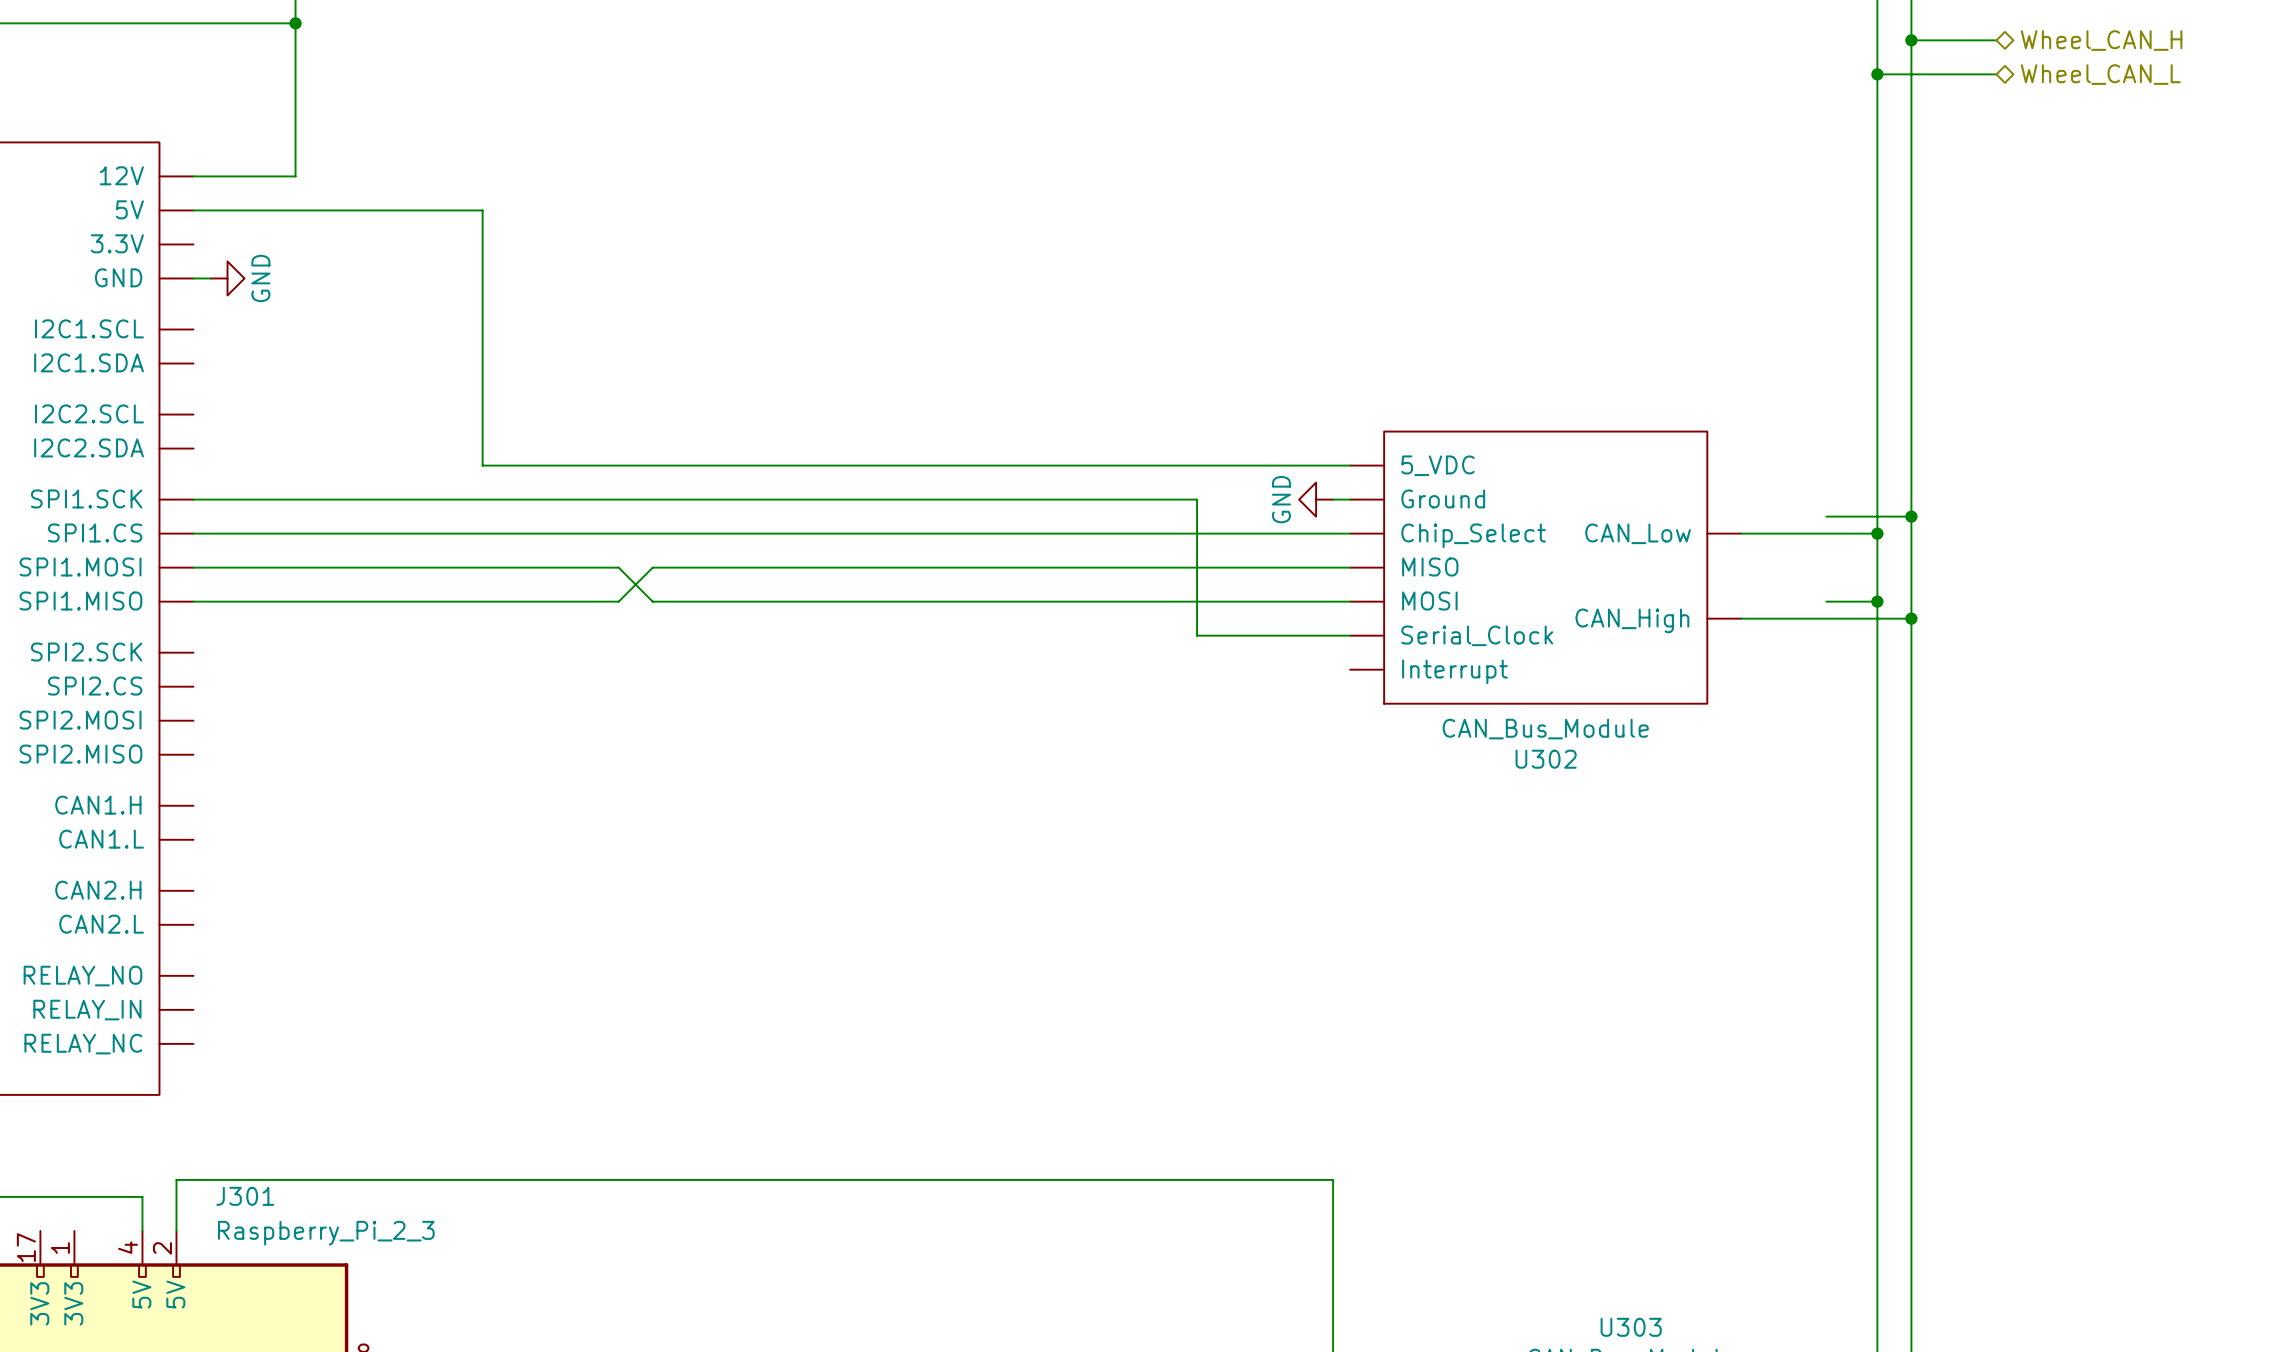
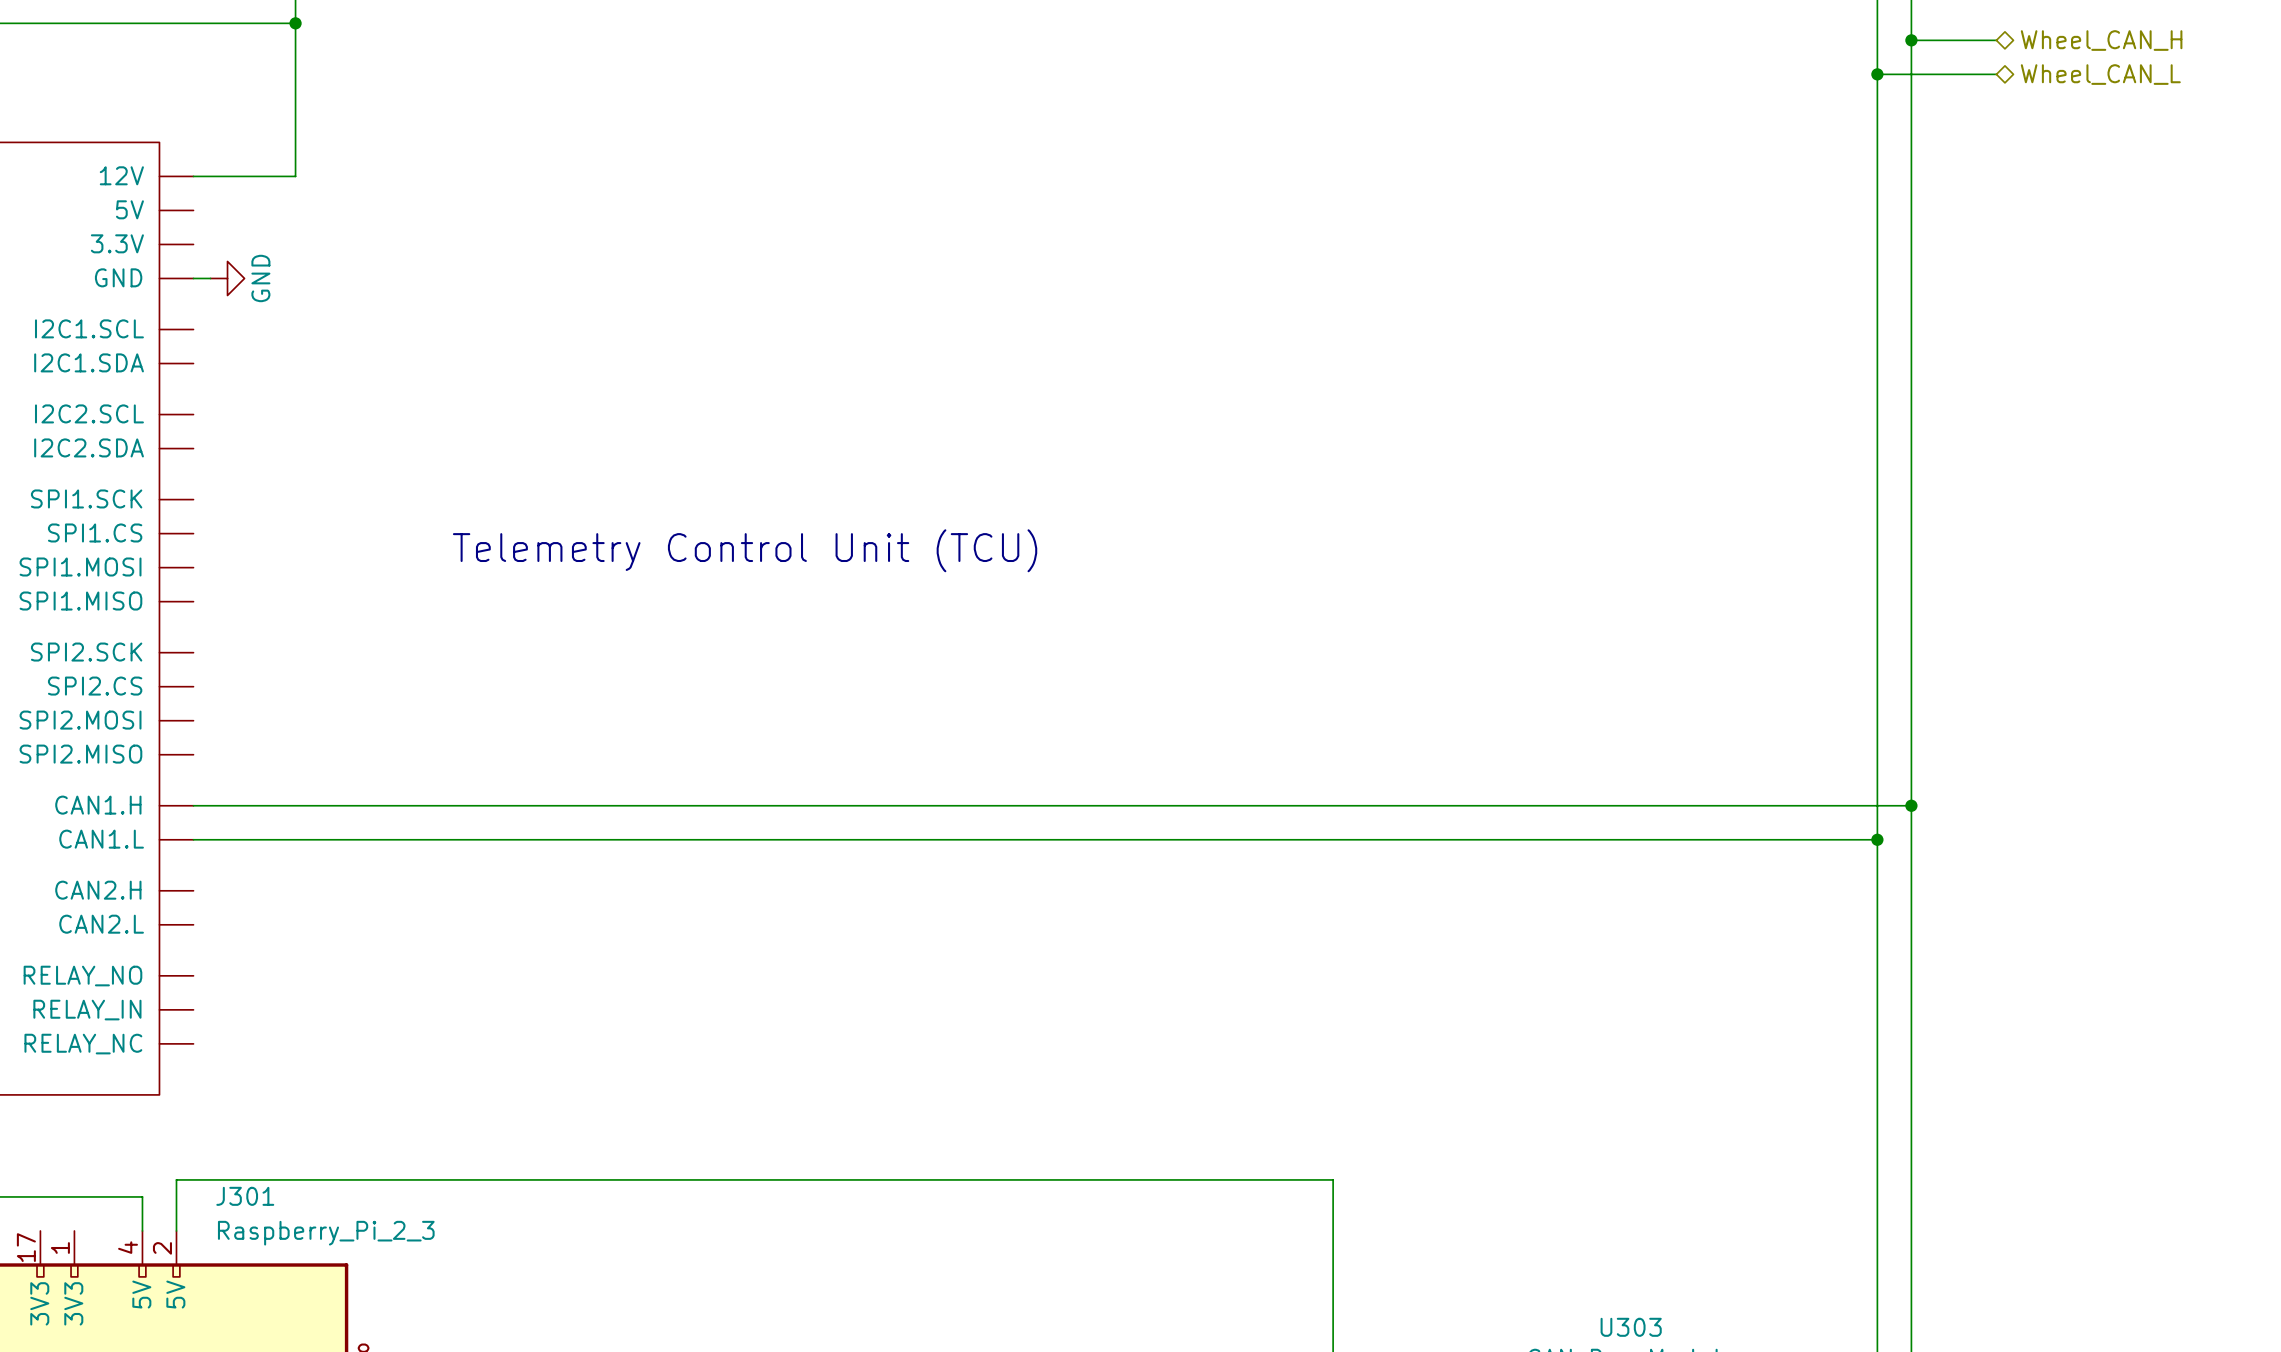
wire: (193, 210) (482, 210) (482, 465) (1350, 465) -> none
wire: (193, 499) (1197, 499) (1197, 635) (1350, 635) -> none
power symbol: GND (1316, 499) -> none
wire: (1333, 499) (1350, 499) -> none
wire: (1826, 516) (1911, 516) -> none
junction: (1911, 516) -> none
wire: (193, 533) (1350, 533) -> none
wire: (1741, 533) (1877, 533) -> none
junction: (1877, 533) -> none
text: none -> Telemetry Control Unit (TCU) (745, 550)
wire: (193, 567) (618, 567) (652, 601) (1350, 601) -> none
wire: (1350, 567) (652, 567) (618, 601) (193, 601) -> none
U302: CAN_Bus_Module (1545, 567) -> none
wire: (1826, 601) (1877, 601) -> none
junction: (1877, 601) -> none
wire: (1741, 618) (1911, 618) -> none
junction: (1911, 618) -> none
wire: none -> (193, 805) (1911, 805)
junction: none -> (1911, 805)
wire: none -> (193, 839) (1877, 839)
junction: none -> (1877, 839)

